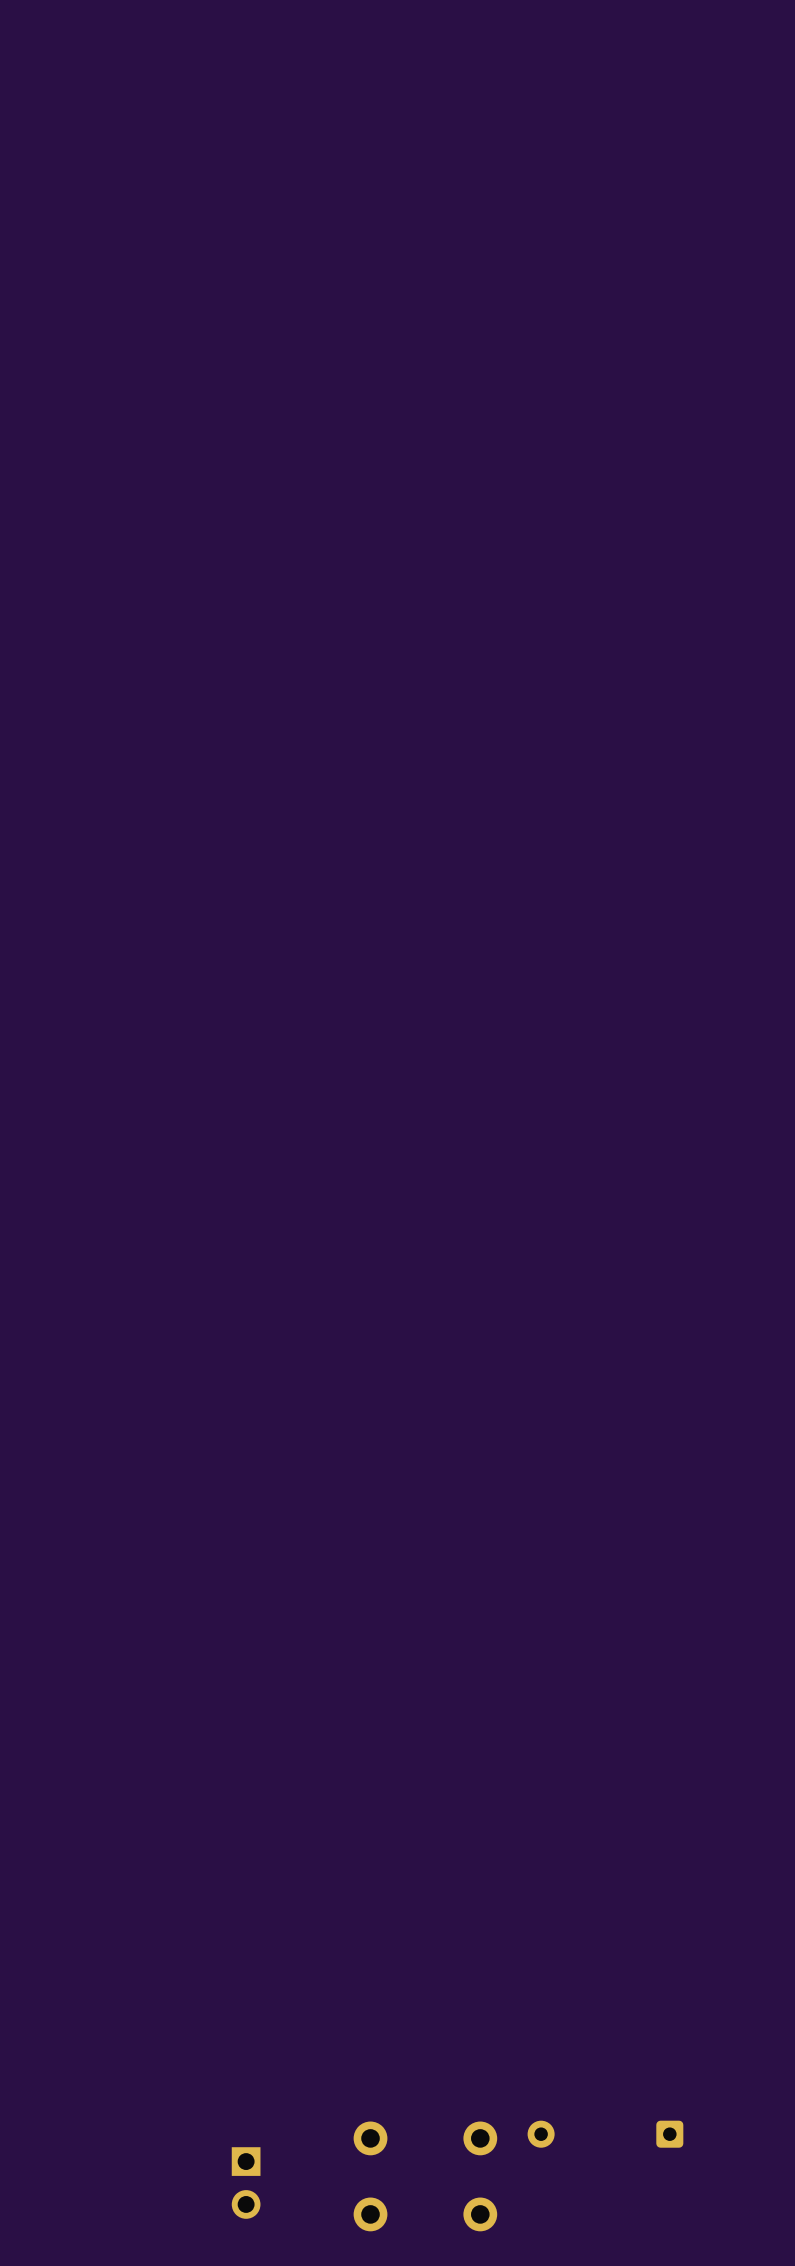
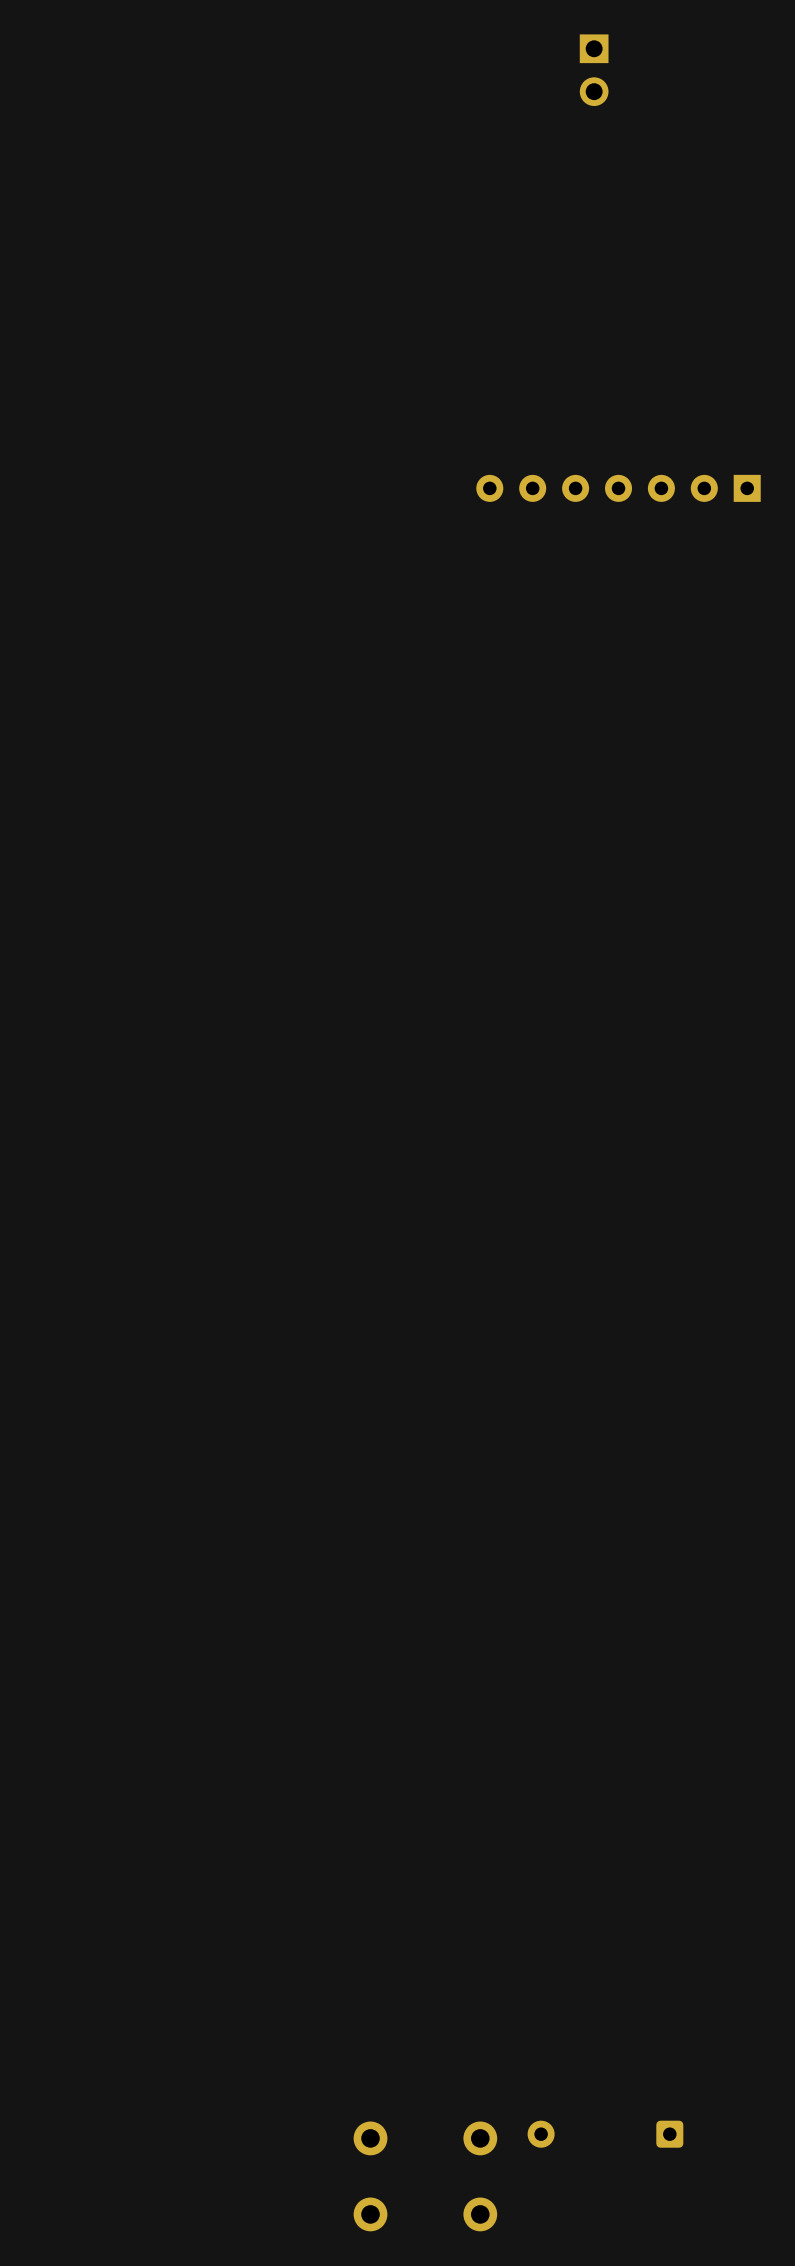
part: none -> (594, 70)
part: none -> (618, 488)
part: (246, 2183) -> none

